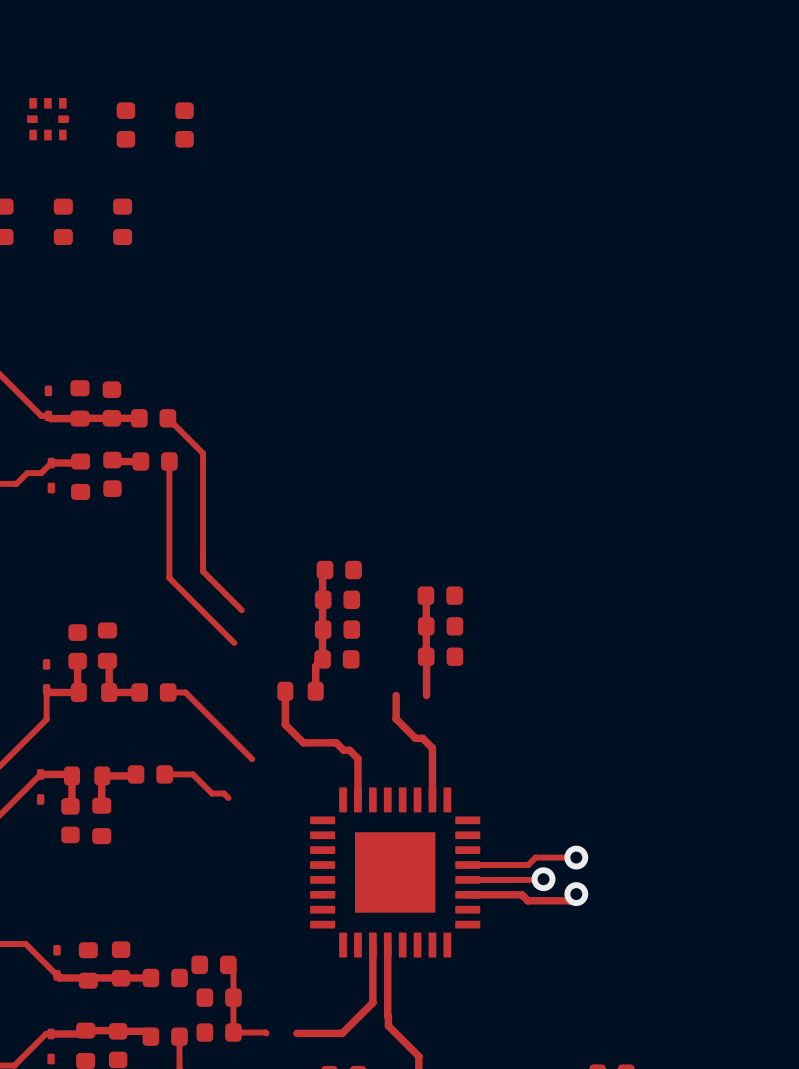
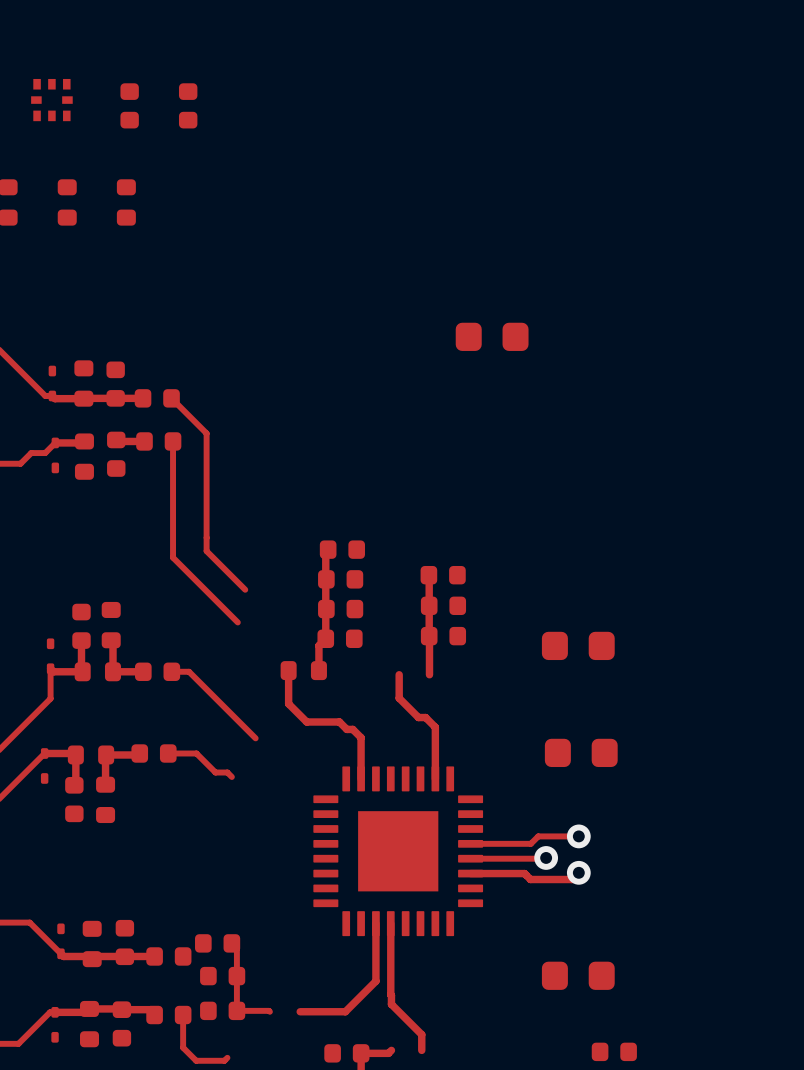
part: none -> (492, 336)
part: none -> (578, 645)
part: none -> (581, 752)
part: none -> (578, 975)

